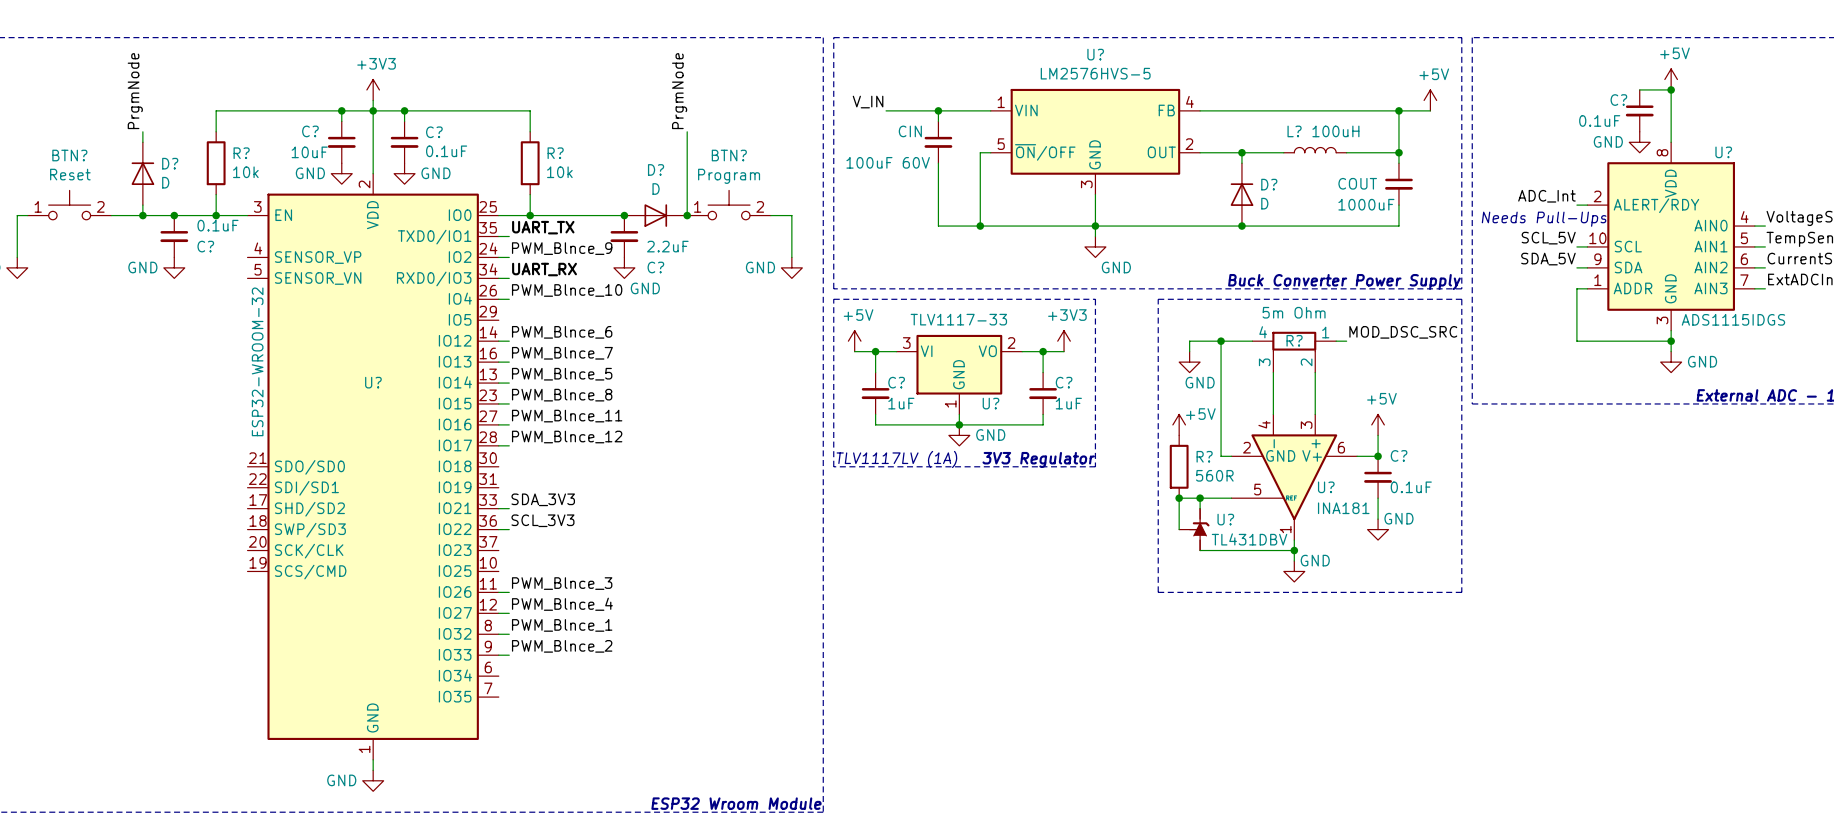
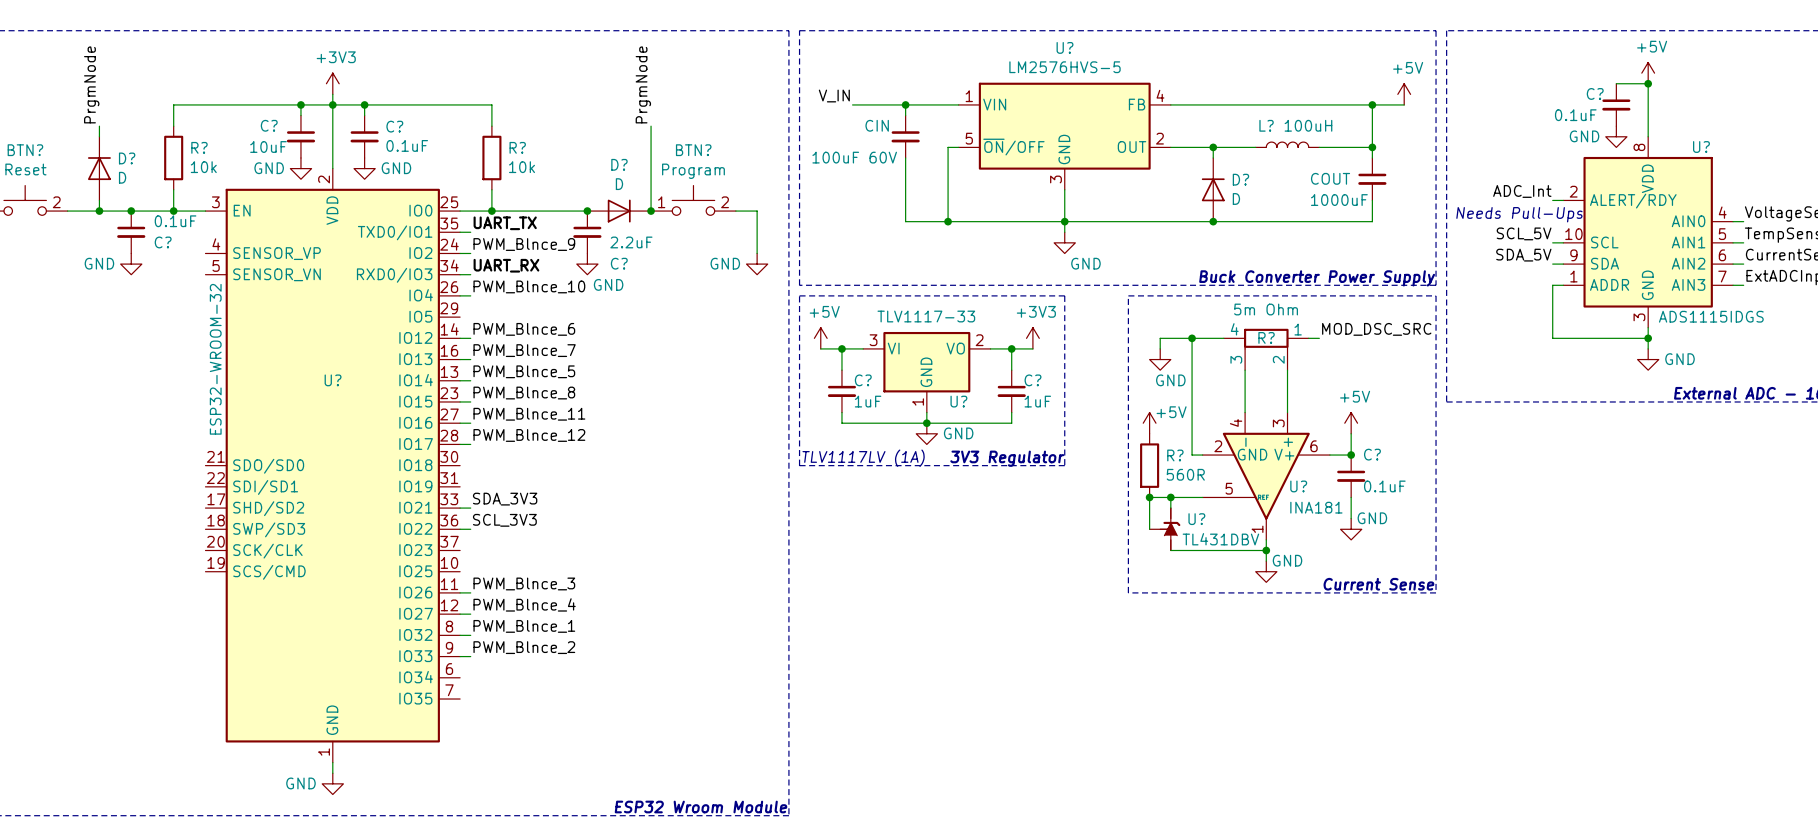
text: none -> Current Sense (1378, 584)

